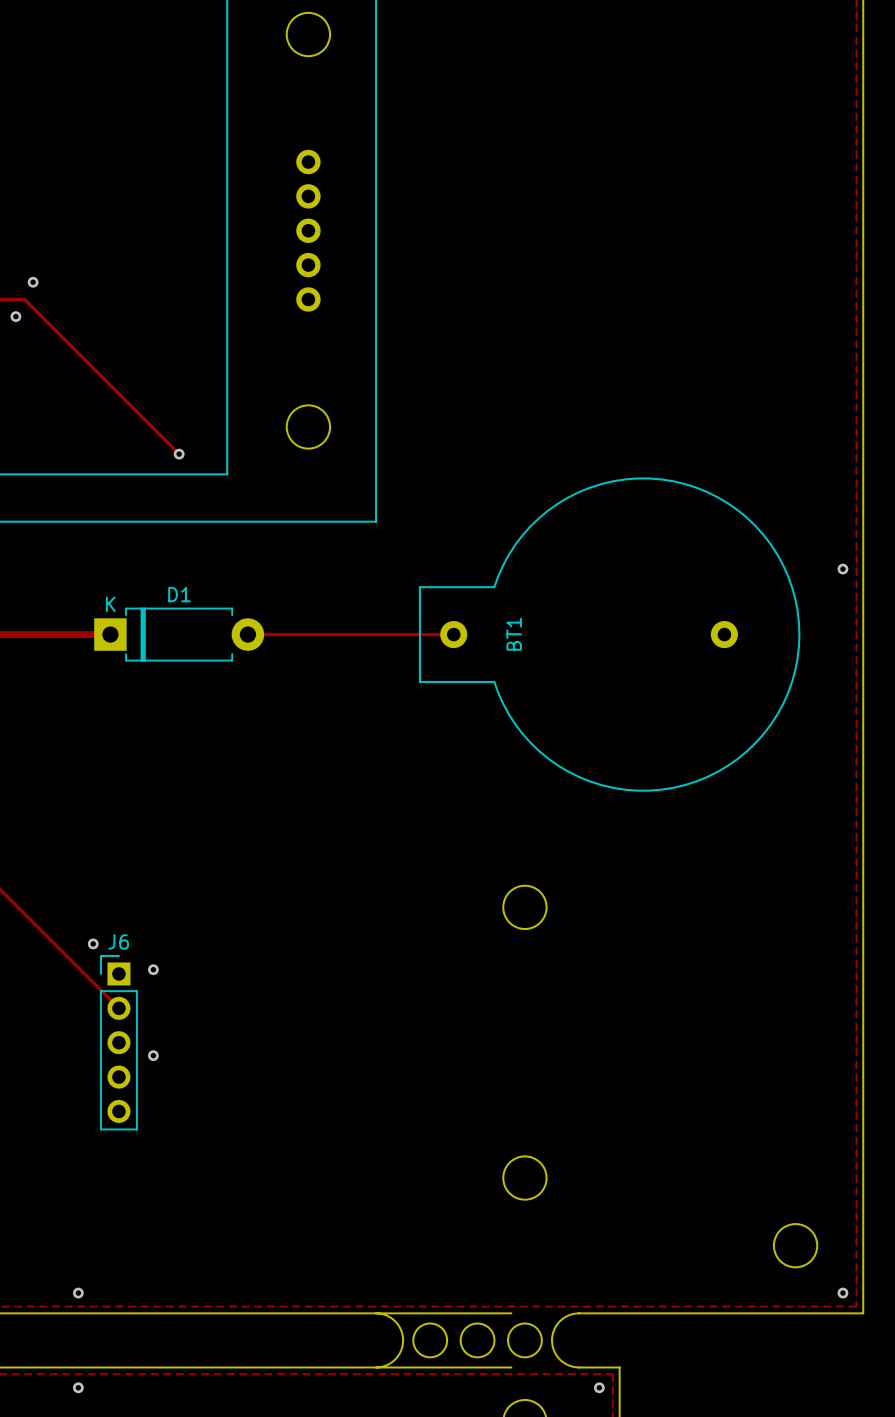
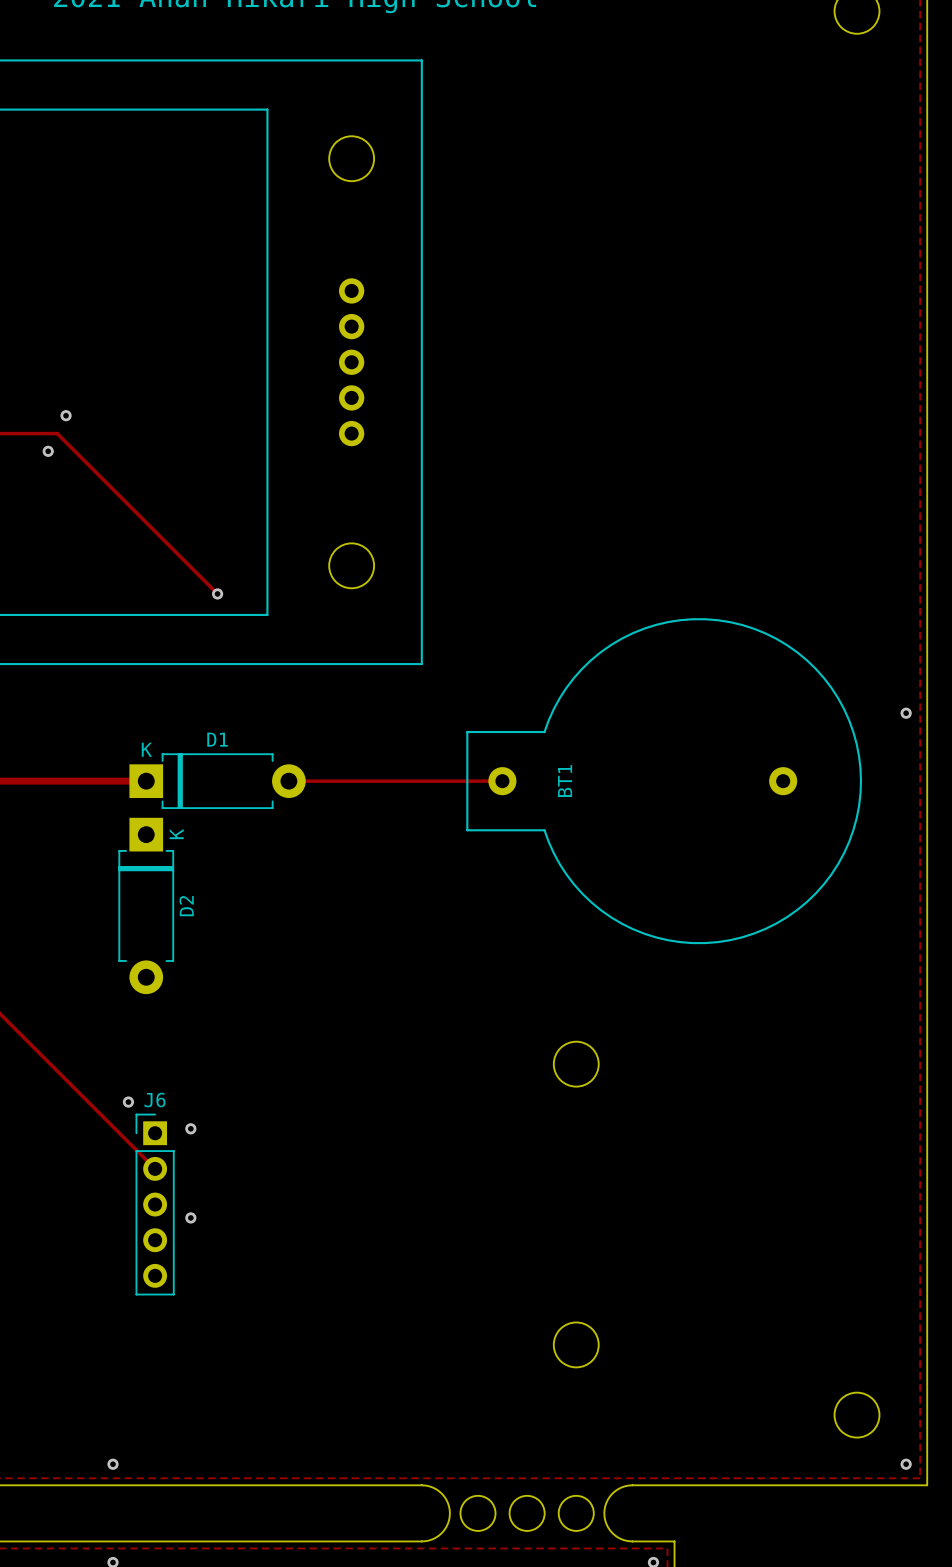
D2: none -> (146, 905)
board edge: (376, 1313) (511, 1313) -> none
board edge: (376, 1367) (511, 1367) -> none

